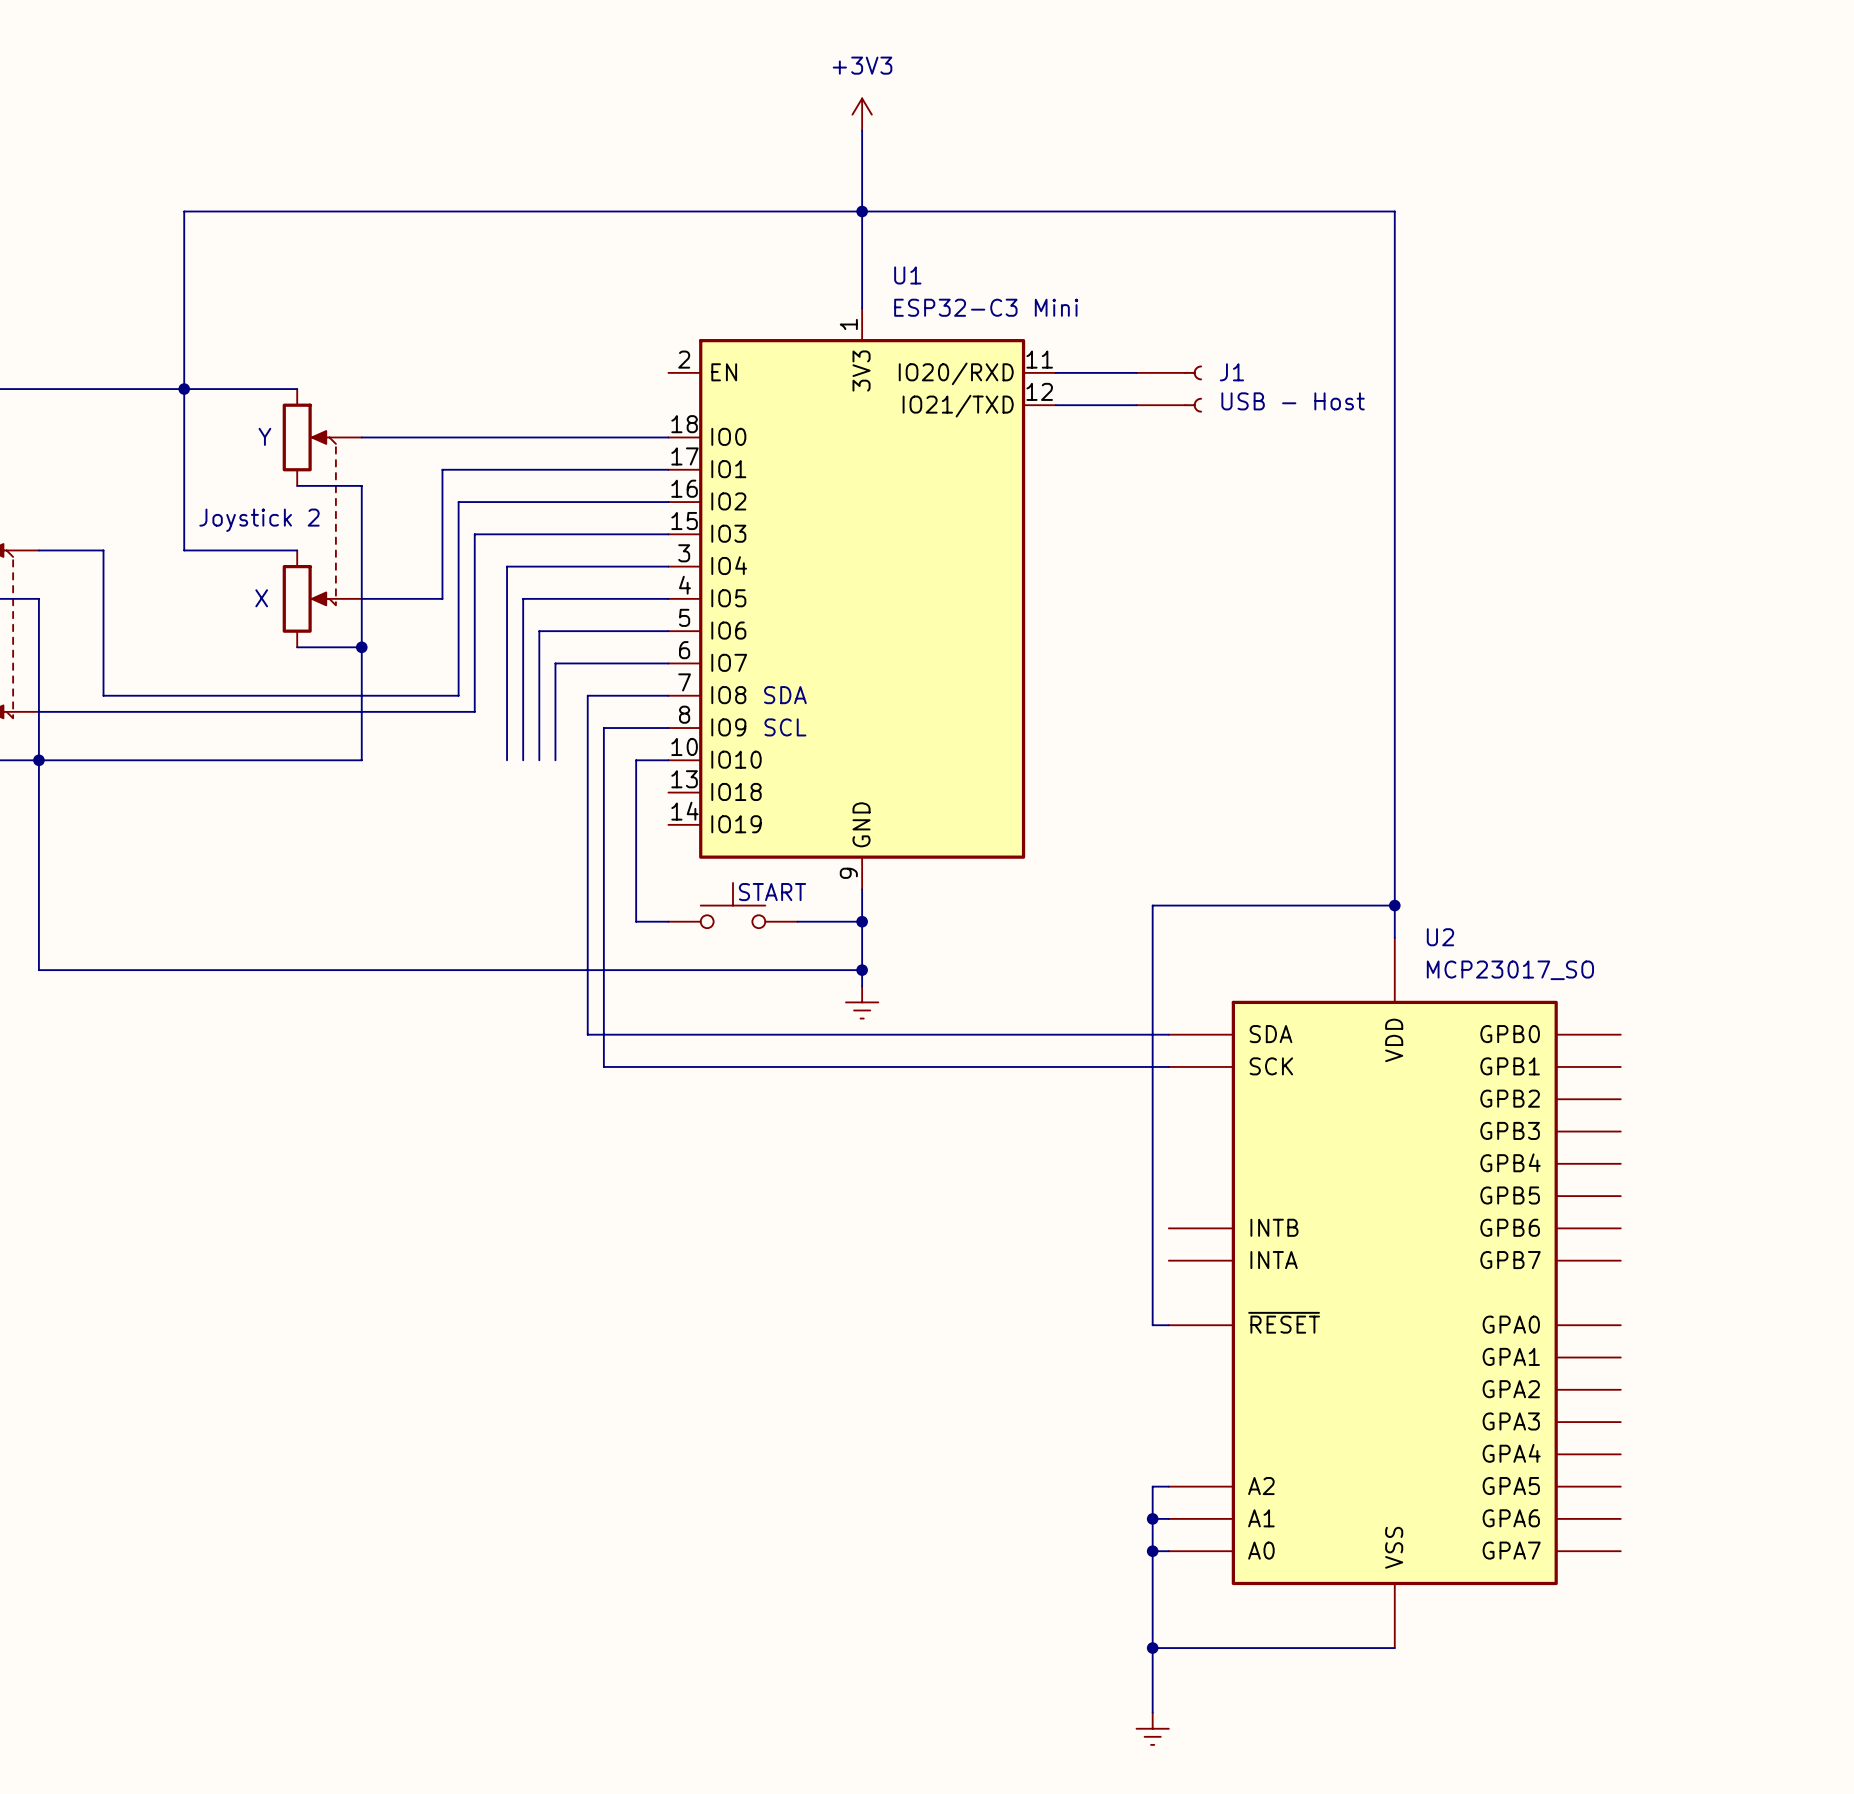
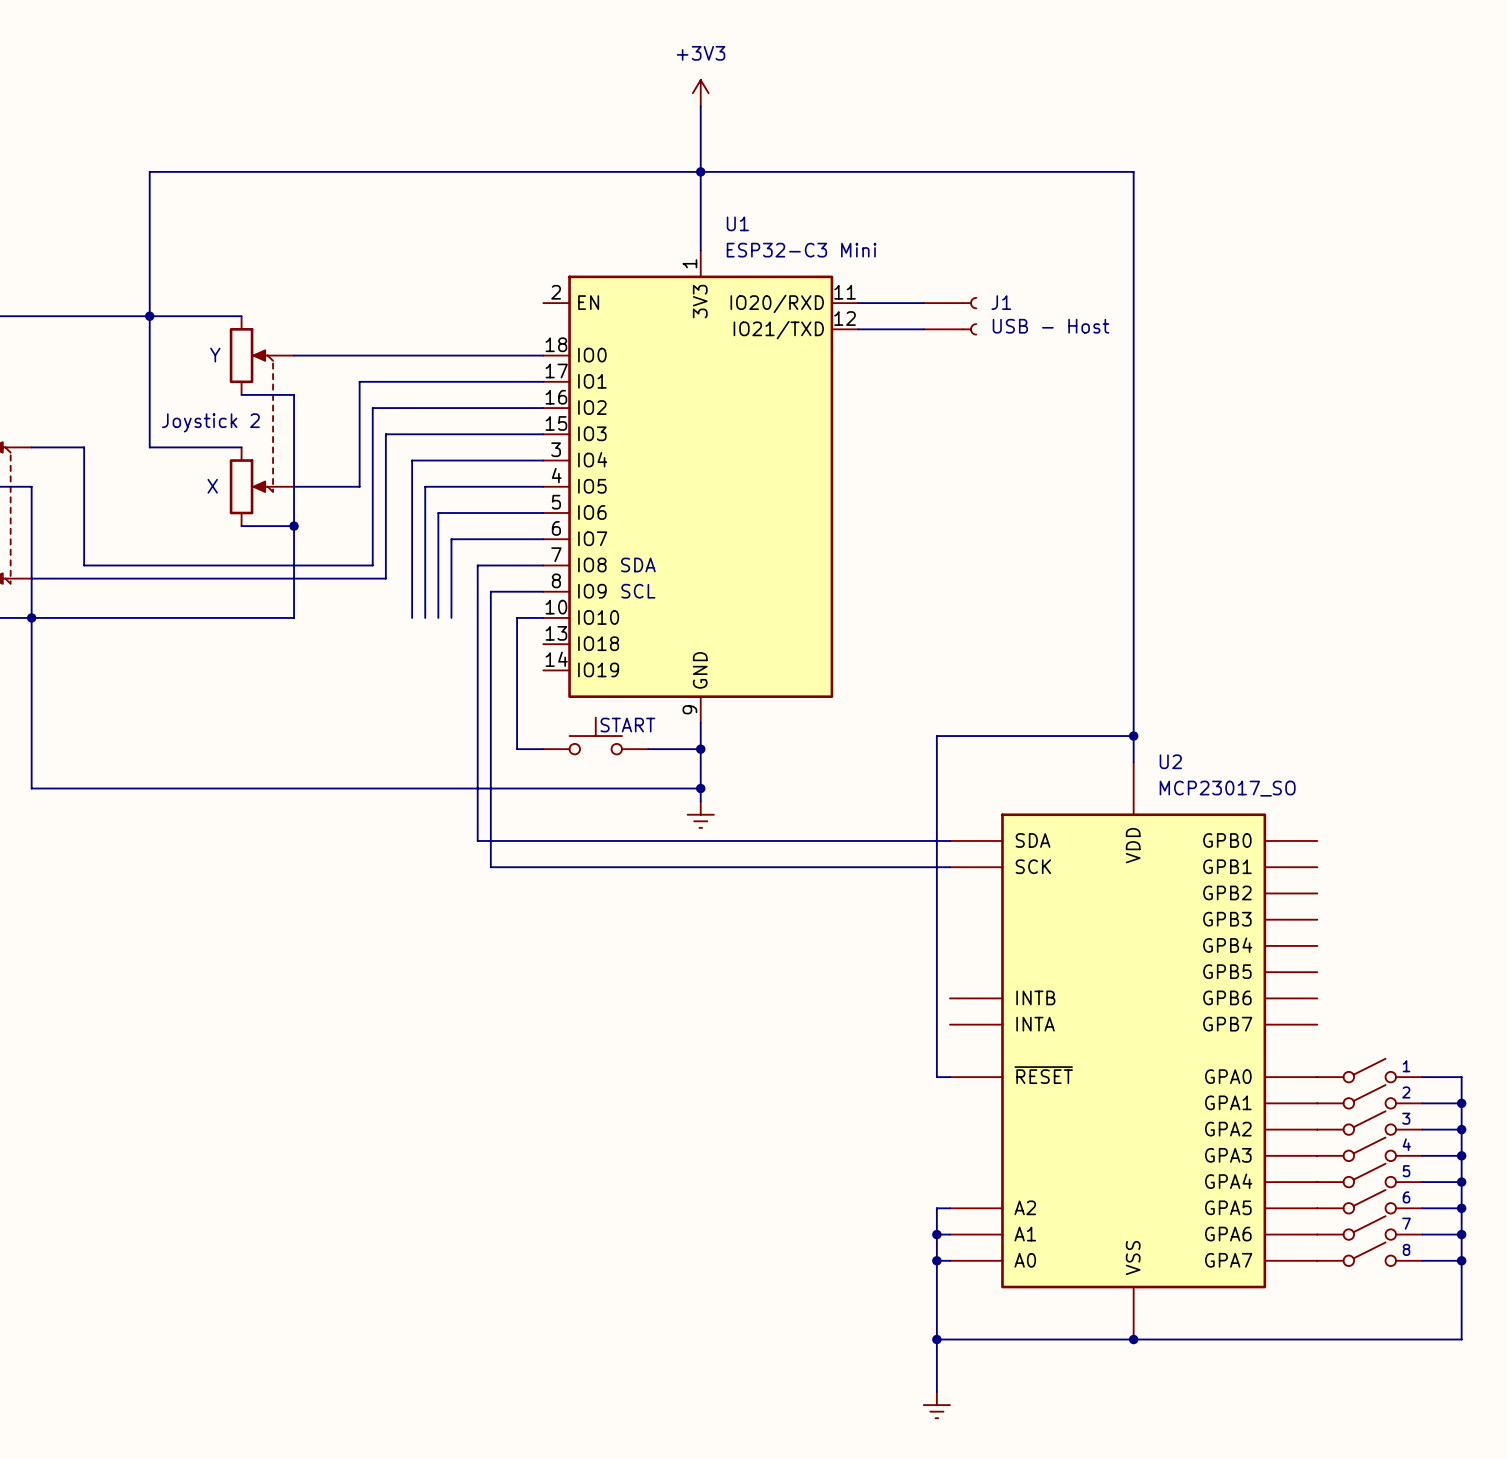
part: none -> 1 (1369, 1070)
wire: none -> (1422, 1077) (1461, 1077) (1461, 1339) (1133, 1339)
part: none -> 2 (1369, 1096)
wire: none -> (1422, 1103) (1461, 1103)
junction: none -> (1461, 1103)
part: none -> 3 (1369, 1123)
wire: none -> (1422, 1129) (1461, 1129)
junction: none -> (1461, 1129)
part: none -> 4 (1369, 1149)
wire: none -> (1422, 1155) (1461, 1155)
junction: none -> (1461, 1155)
part: none -> 5 (1369, 1175)
wire: none -> (1422, 1182) (1461, 1182)
junction: none -> (1461, 1182)
part: none -> 6 (1369, 1201)
wire: none -> (1422, 1208) (1461, 1208)
junction: none -> (1461, 1208)
part: none -> 7 (1369, 1228)
wire: none -> (1422, 1234) (1461, 1234)
junction: none -> (1461, 1234)
part: none -> 8 (1369, 1254)
wire: none -> (1422, 1260) (1461, 1260)
junction: none -> (1461, 1260)
junction: none -> (1133, 1339)

